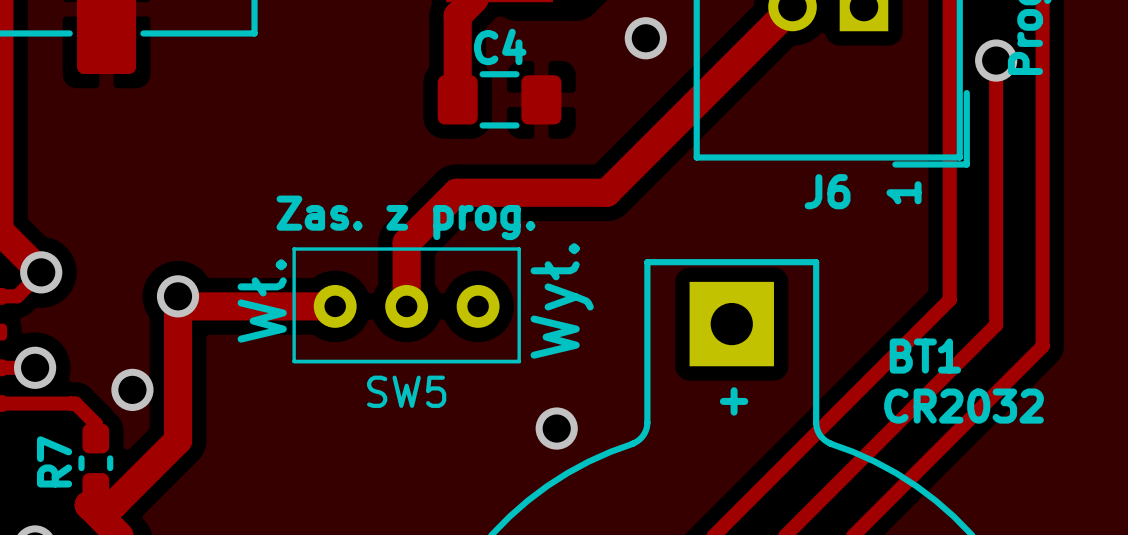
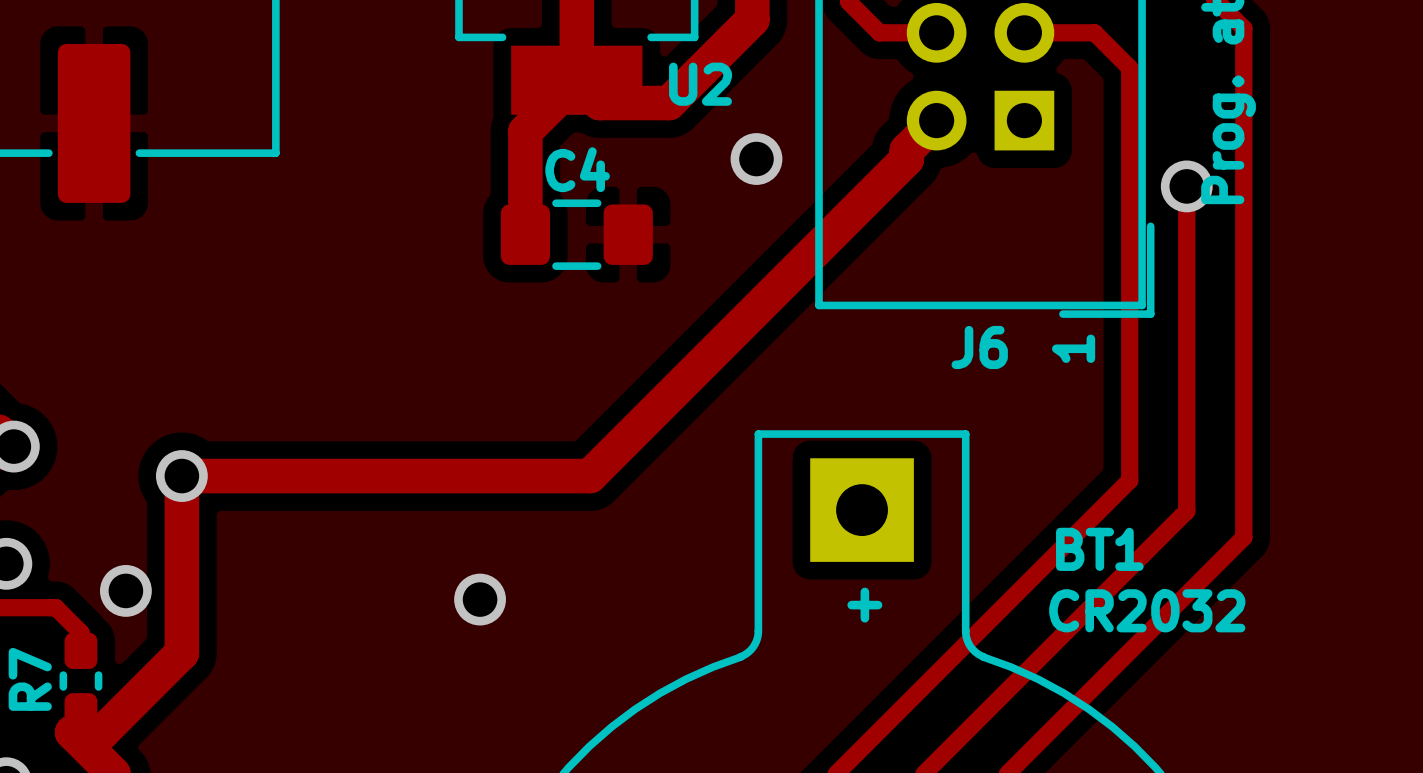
track: (768, 31) (606, 192) (456, 192) (406, 242) (406, 306) -> (906, 150) (906, 159) (589, 476) (181, 476)
text: Zas. z prog. (405, 217) -> none
track: (178, 296) (188, 306) (335, 306) -> none
text: Wł. (262, 300) -> none
text: Wył. (562, 300) -> none
SW5: (406, 305) -> none
via position: (556, 428) -> (480, 599)

